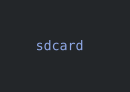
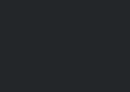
text: sdcard (59, 45) -> none

